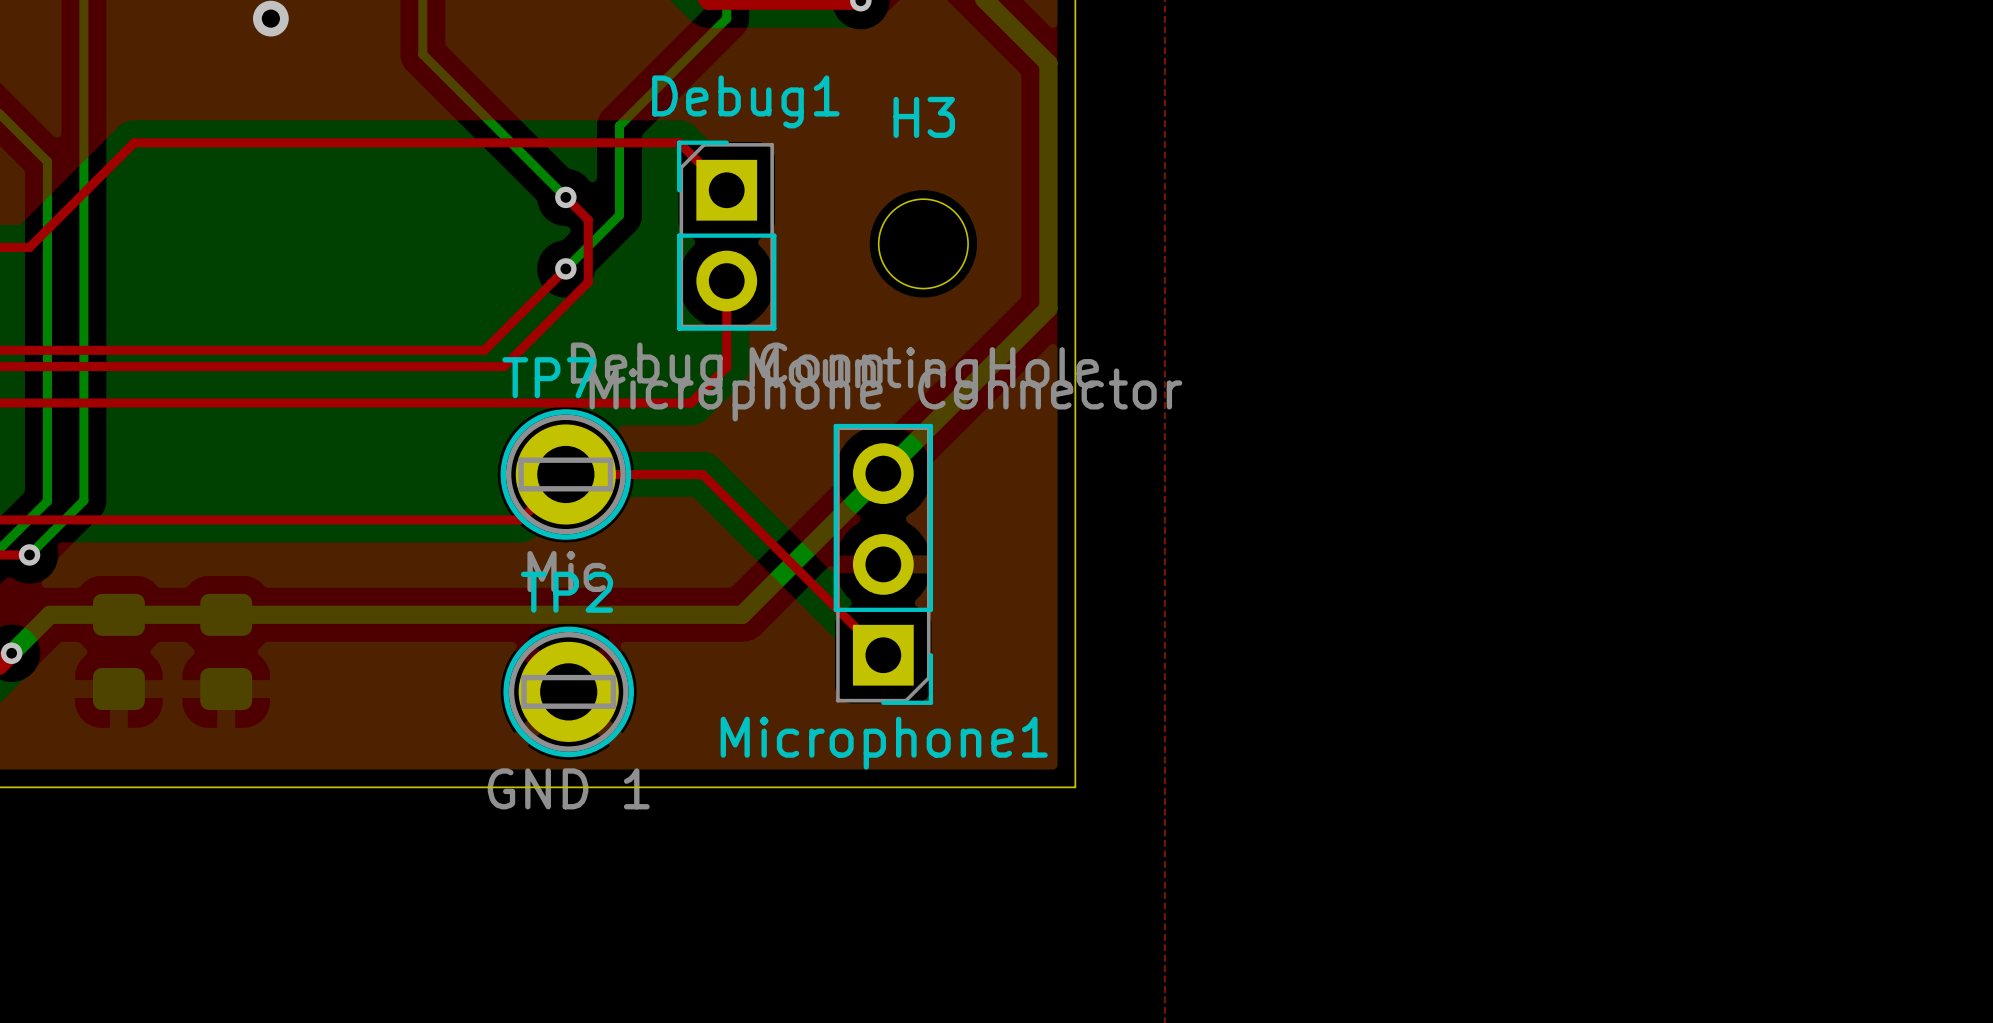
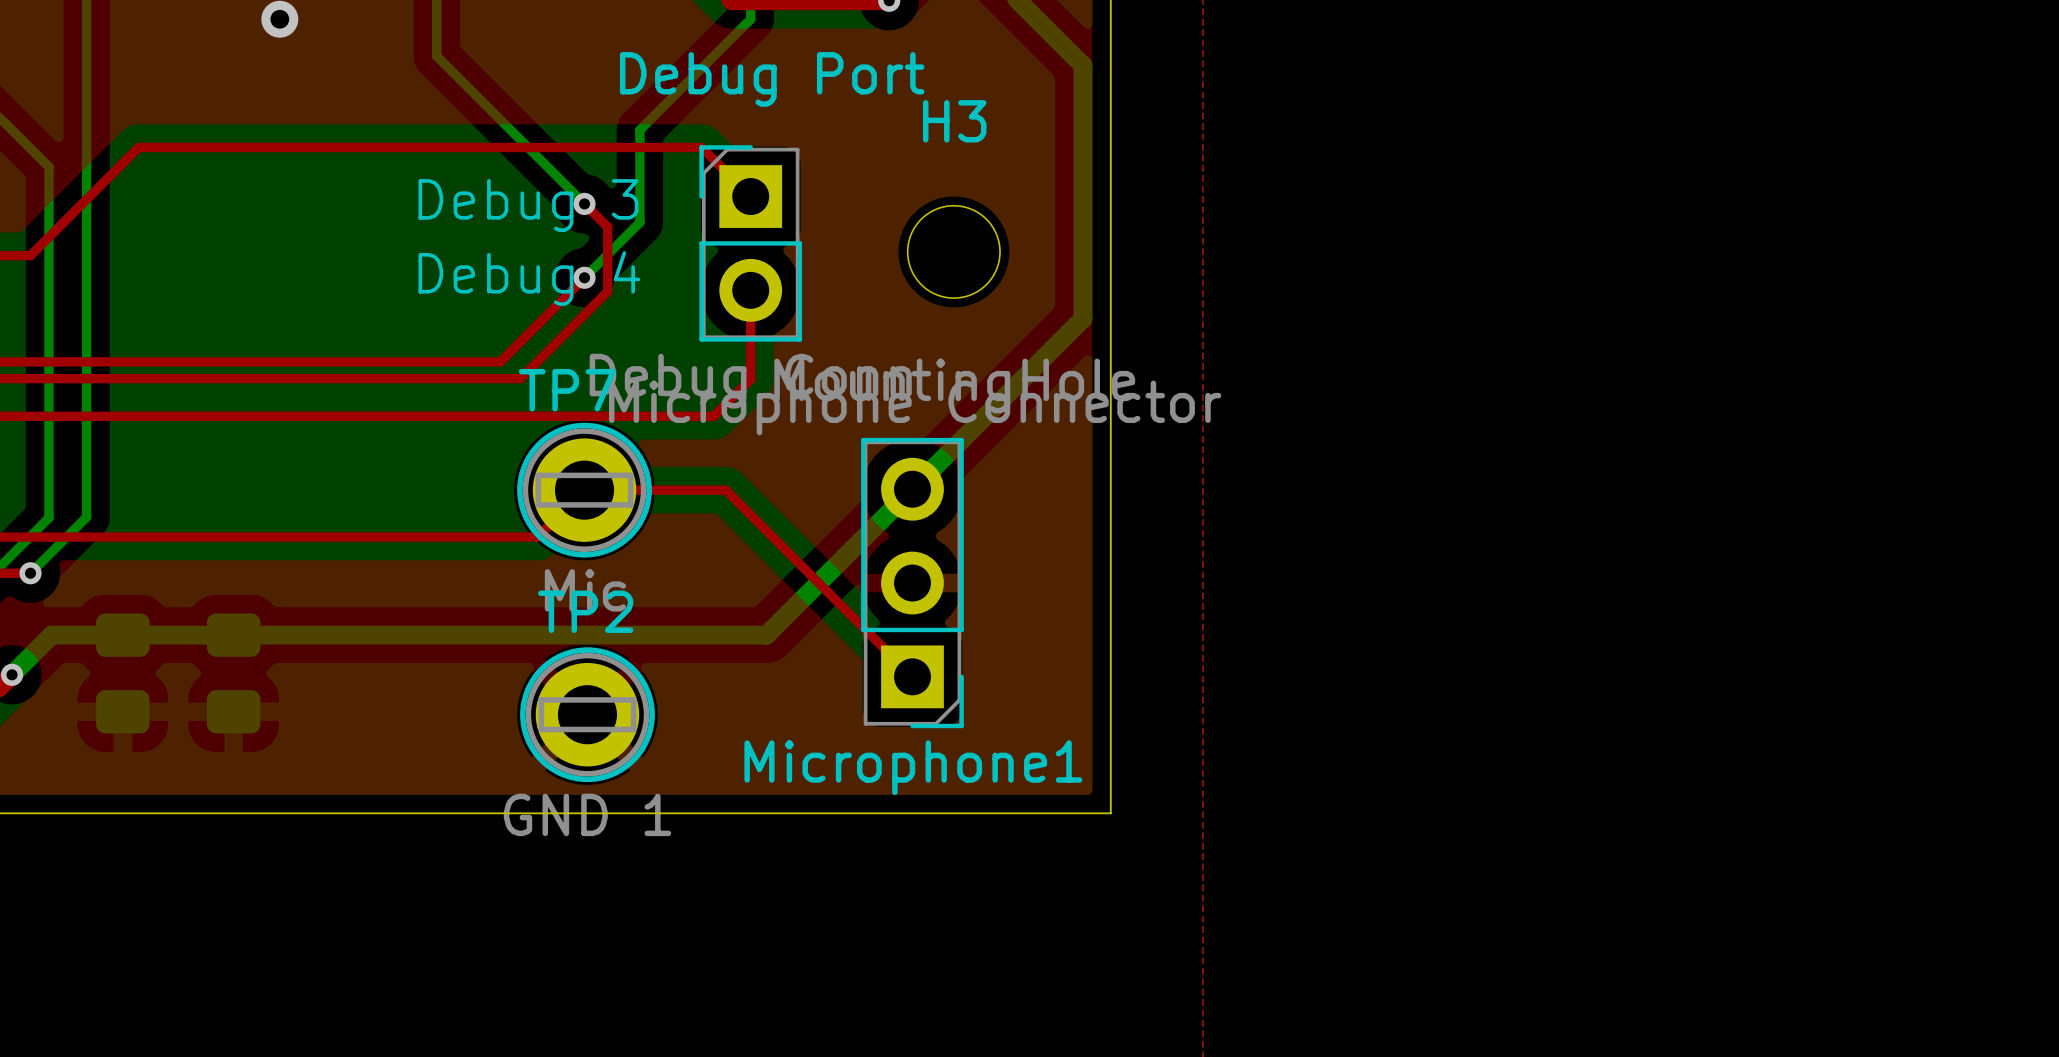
Debug1 name: Debug1 (745, 101) -> Debug Port (772, 79)
text: none -> Debug 3 (528, 205)
text: none -> Debug 4 (529, 278)

